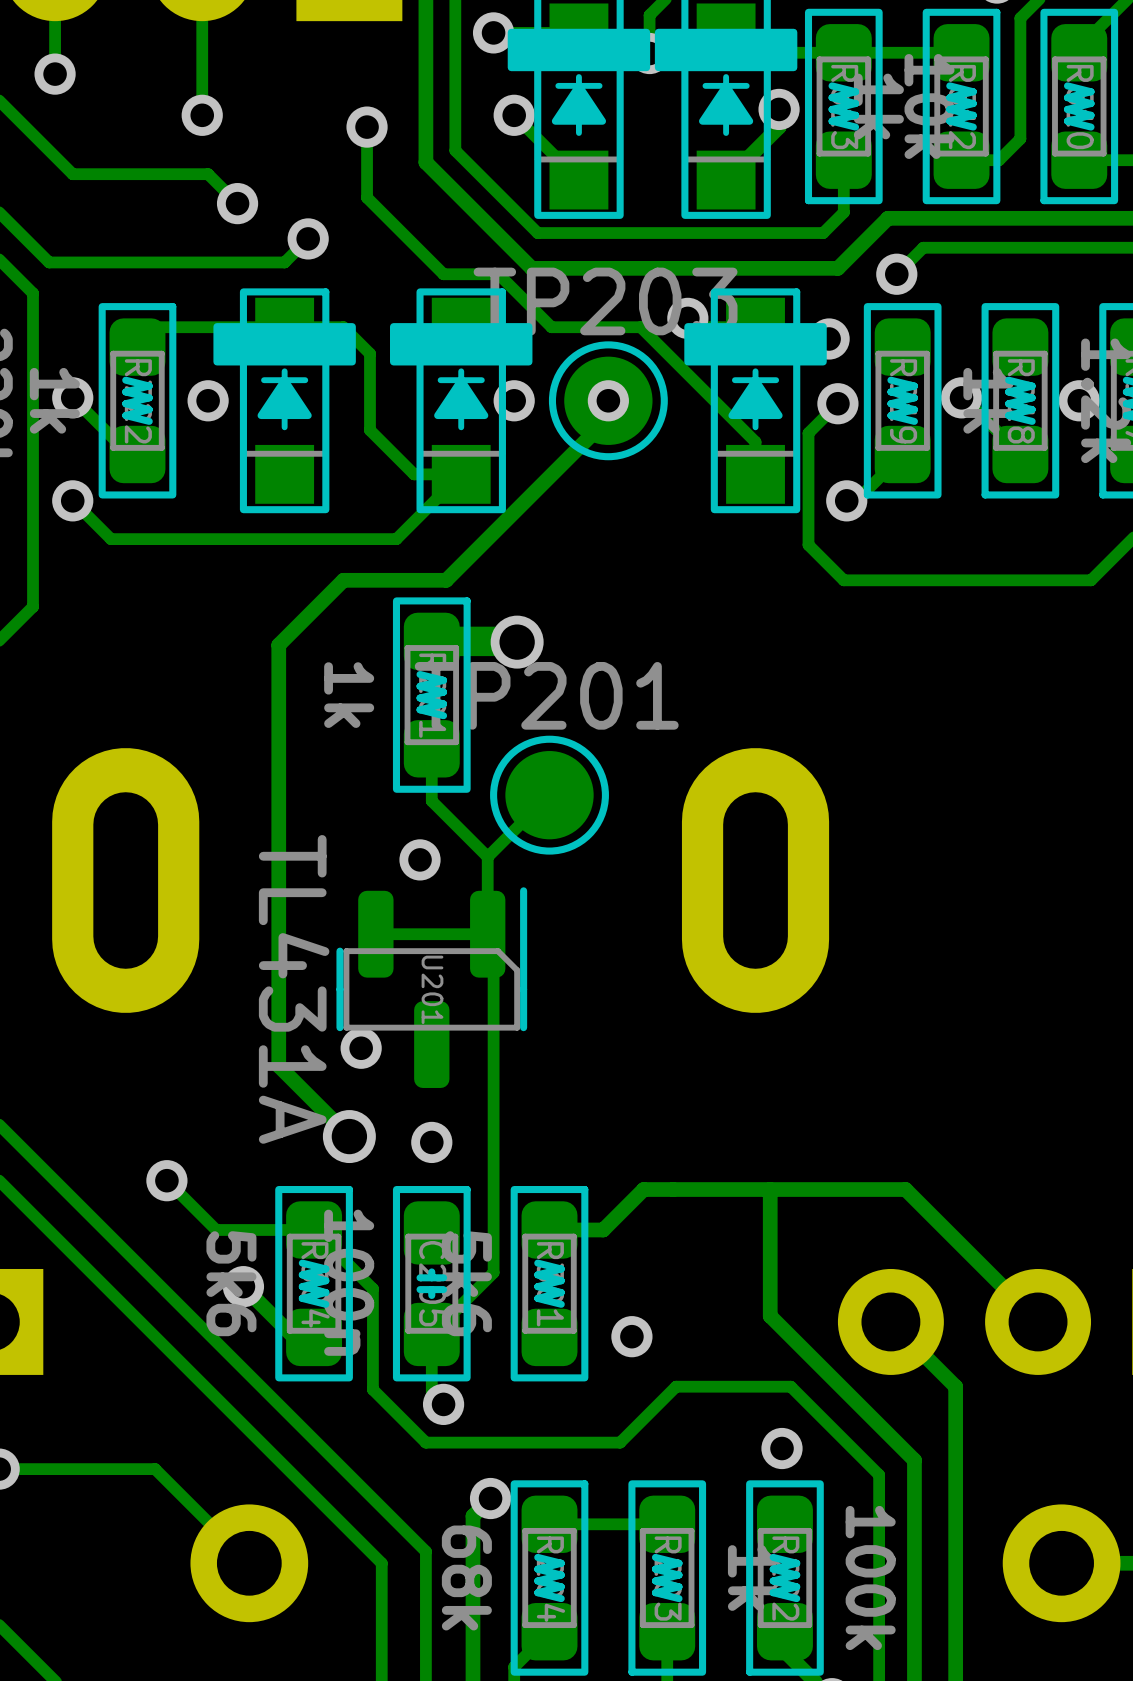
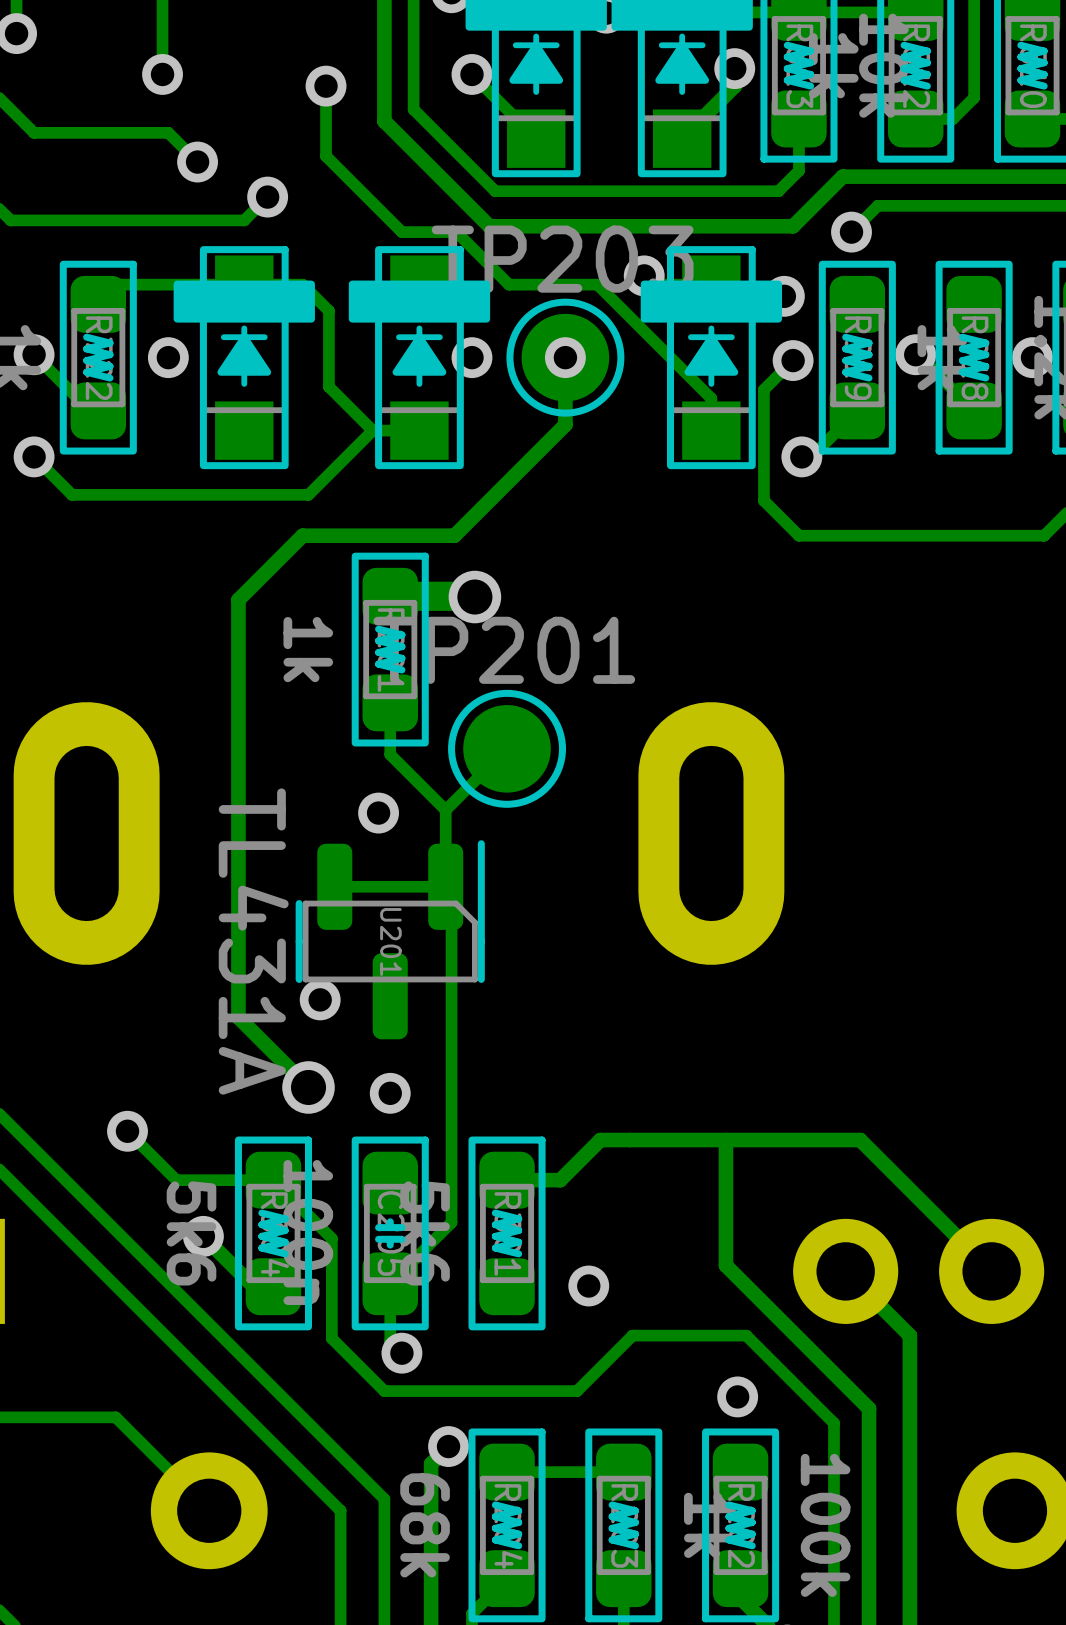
track: (608, 418) (446, 580) -> (565, 374) (565, 424) (454, 535) (404, 535)
track: (461, 474) (396, 539) (349, 539) -> (372, 430) (308, 494)

